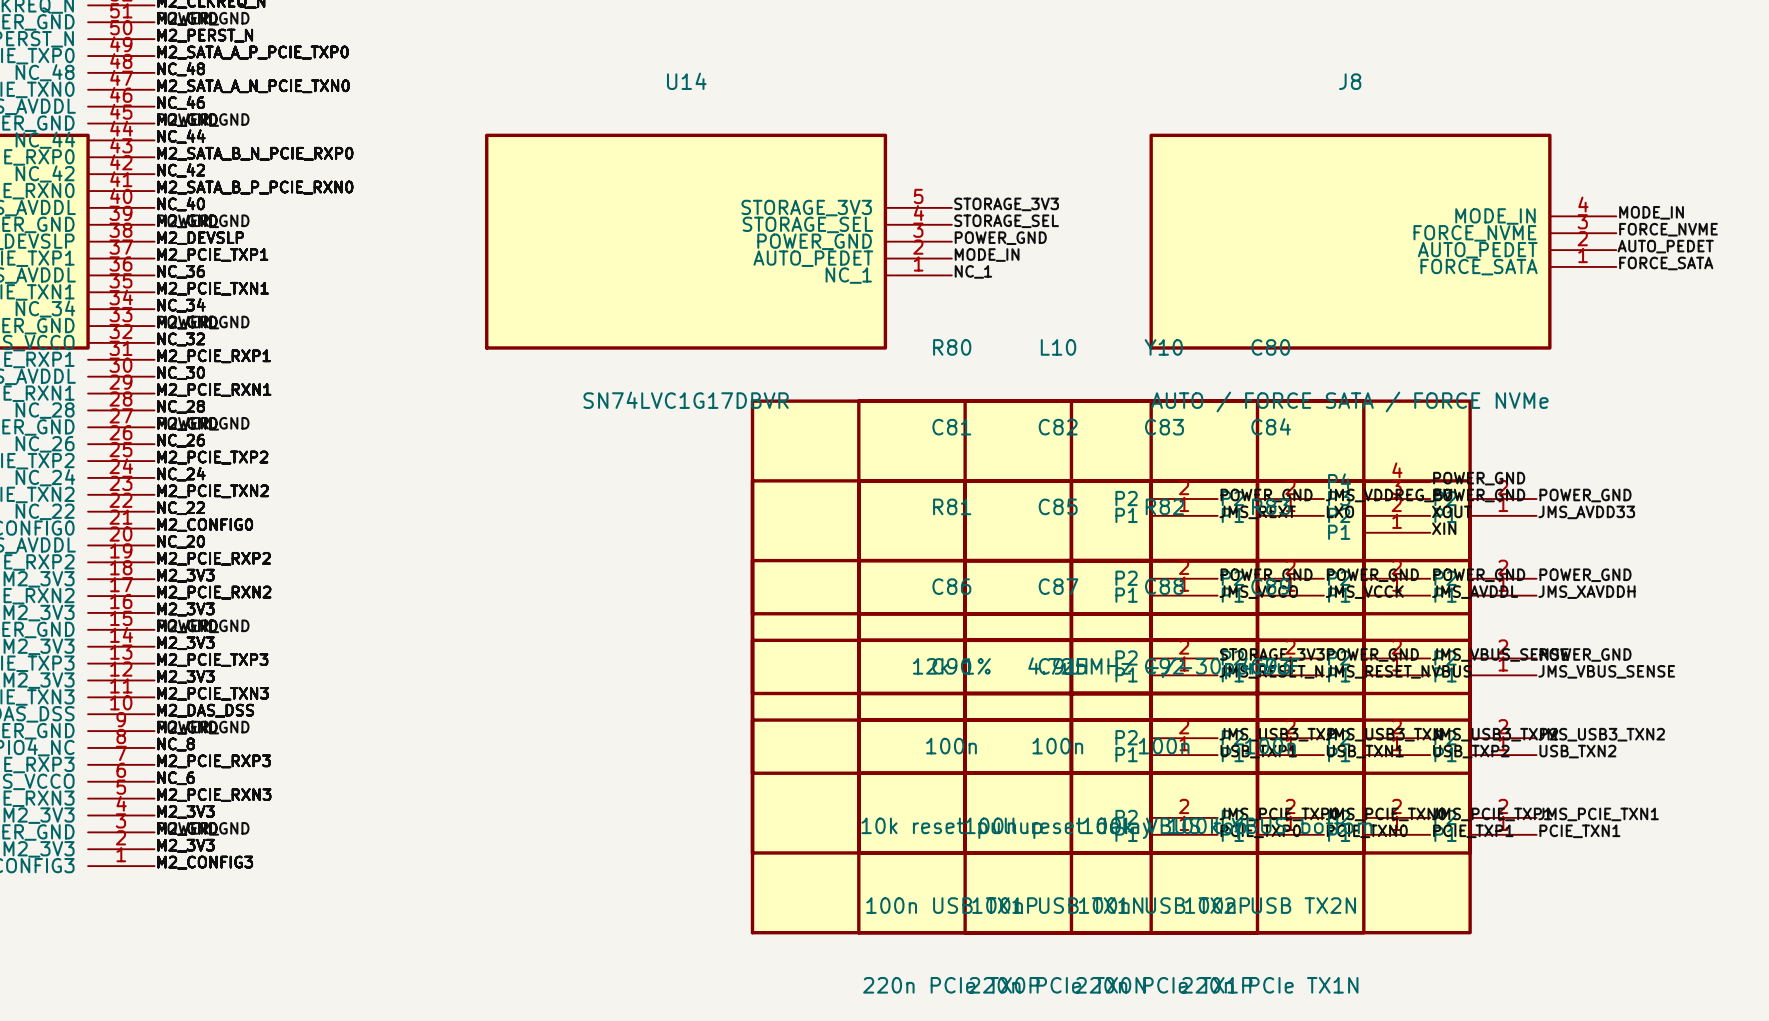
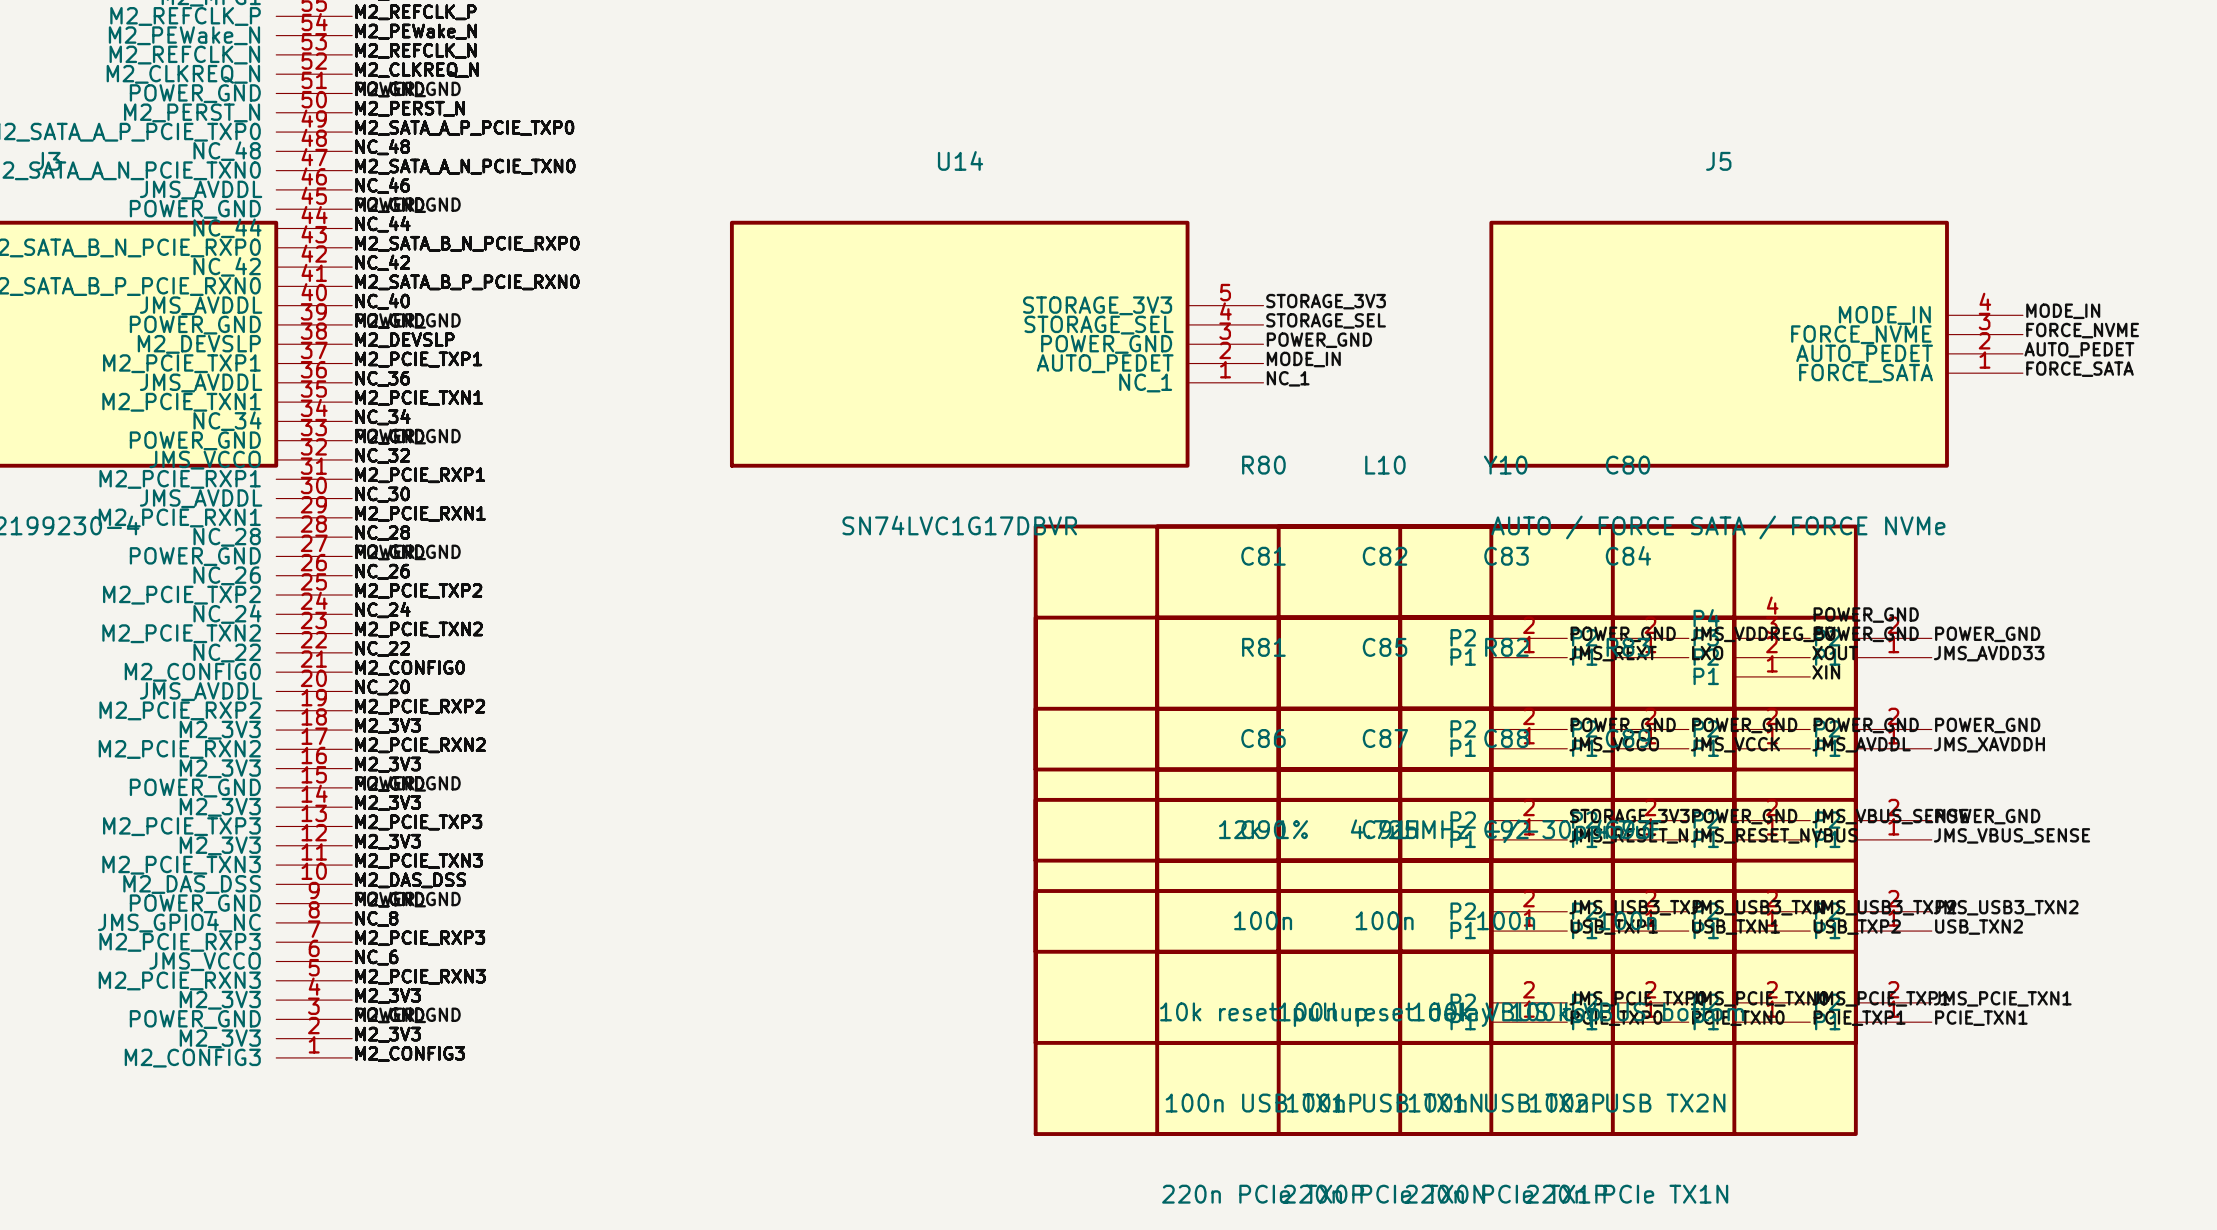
J8 name: J8 (1350, 81) -> J5 (1718, 161)

